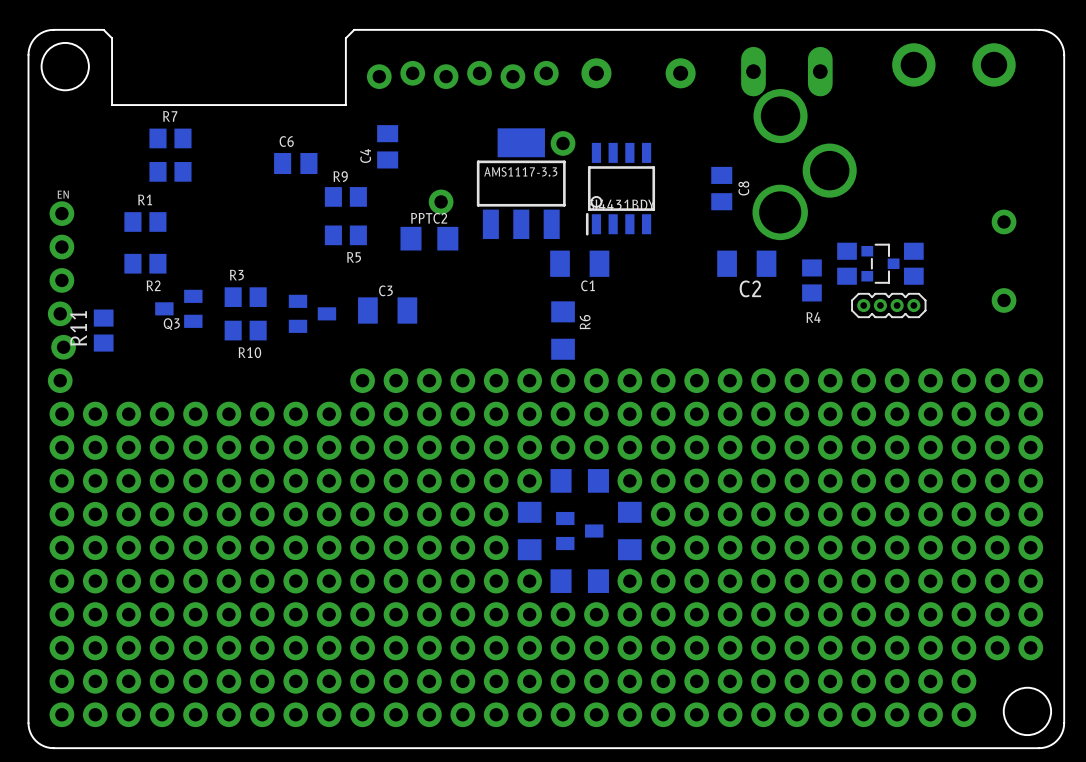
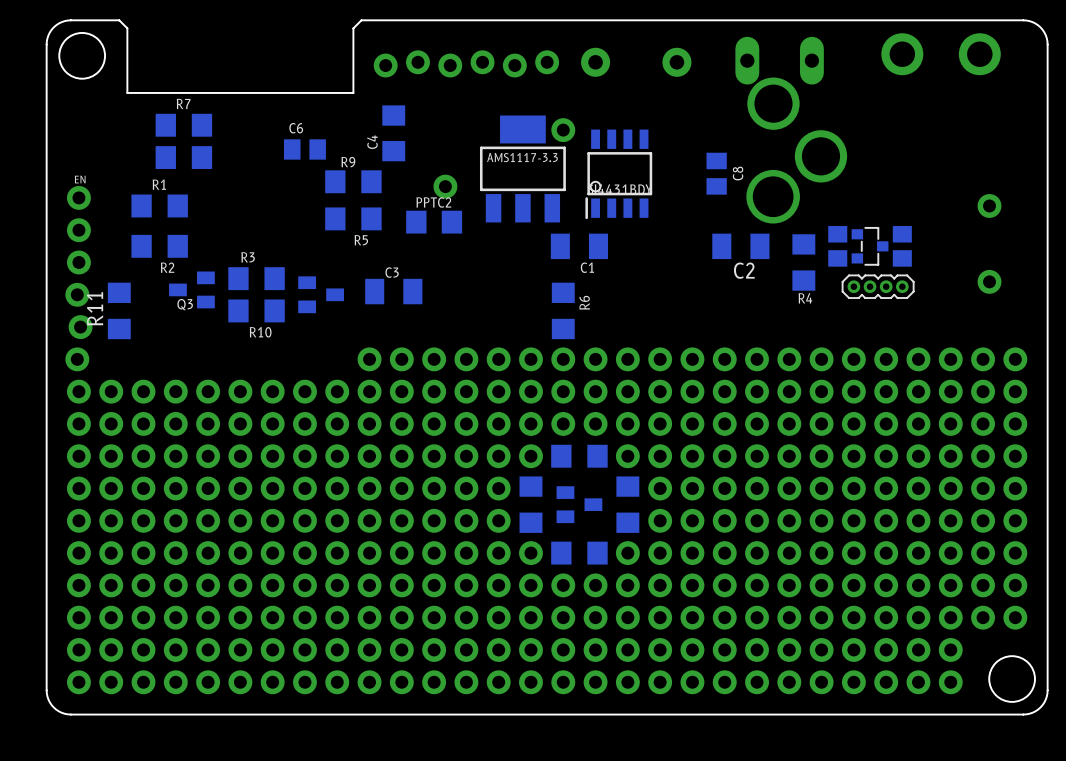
C4 footprint: [377, 125, 399, 169] -> [382, 105, 406, 162]
R7 footprint: [149, 128, 192, 149] -> [155, 113, 213, 137]
part footprint: [149, 161, 192, 182] -> [155, 146, 213, 170]
R9 footprint: [324, 187, 367, 207] -> [325, 170, 382, 194]
R1 footprint: [124, 212, 167, 232] -> [131, 194, 188, 218]
R5 footprint: [324, 225, 367, 246] -> [325, 207, 382, 231]
R2 footprint: [124, 253, 167, 274] -> [131, 234, 188, 258]
R4 footprint: [802, 259, 822, 302] -> [792, 234, 816, 291]
R3 footprint: [224, 287, 267, 308] -> [228, 267, 285, 291]
R11 footprint: [93, 309, 114, 352] -> [107, 282, 131, 340]
R10 footprint: [224, 320, 267, 341] -> [228, 299, 285, 323]

